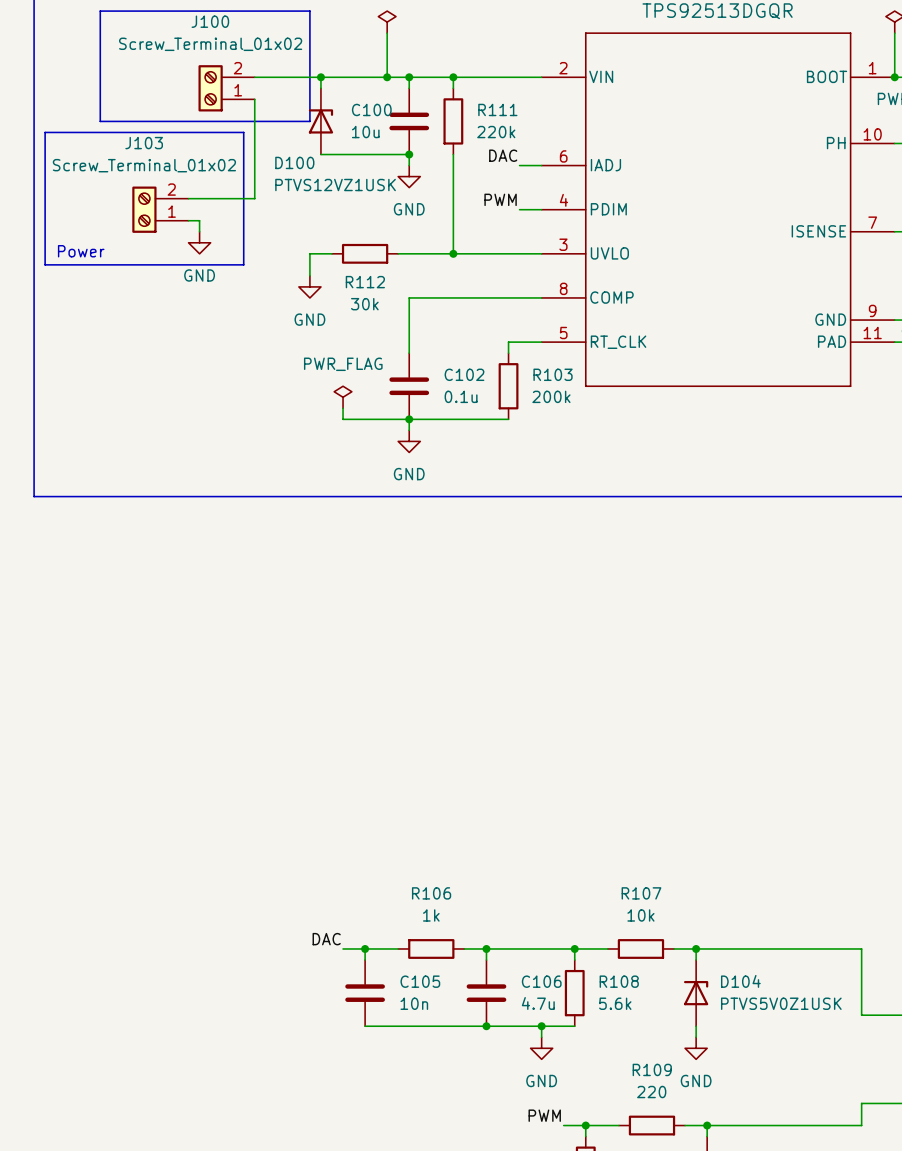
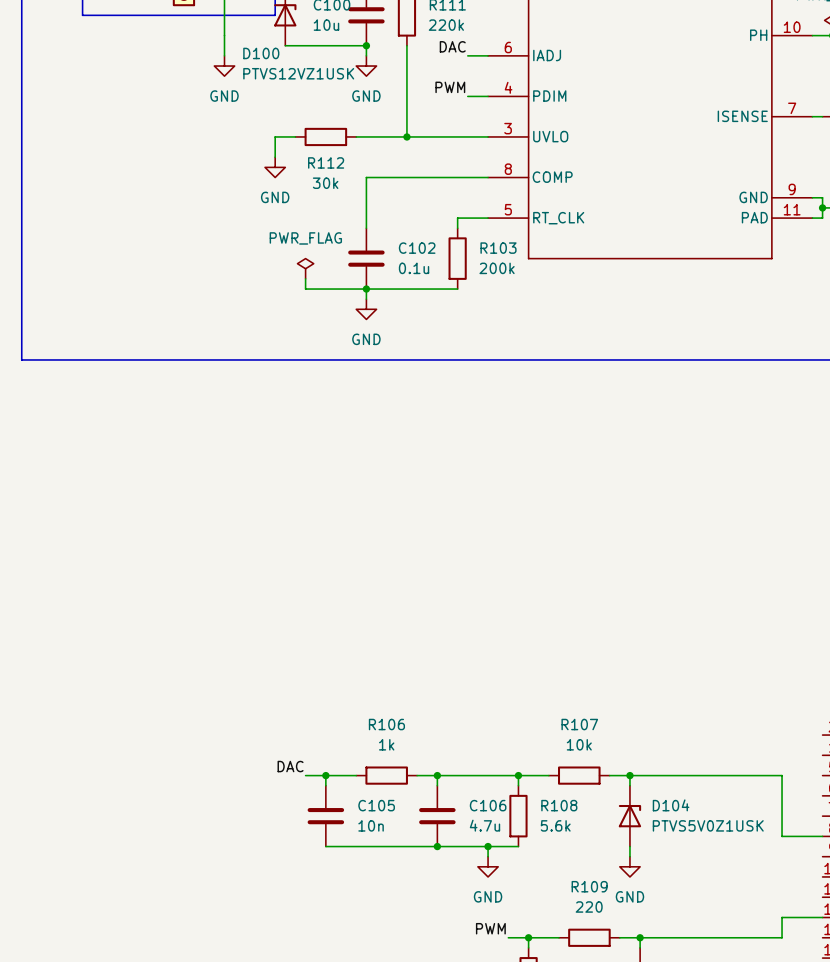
line: (45, 132) (243, 132) (243, 264) (45, 264) (45, 132) -> none
wire: (254, 165) (254, 198) (188, 198) -> none
J103: Screw_Terminal_01x02 (160, 209) -> none
wire: (188, 220) (199, 220) (199, 231) -> none
power symbol position: GND (199, 242) -> GND (224, 66)
text: Power (81, 251) -> none

